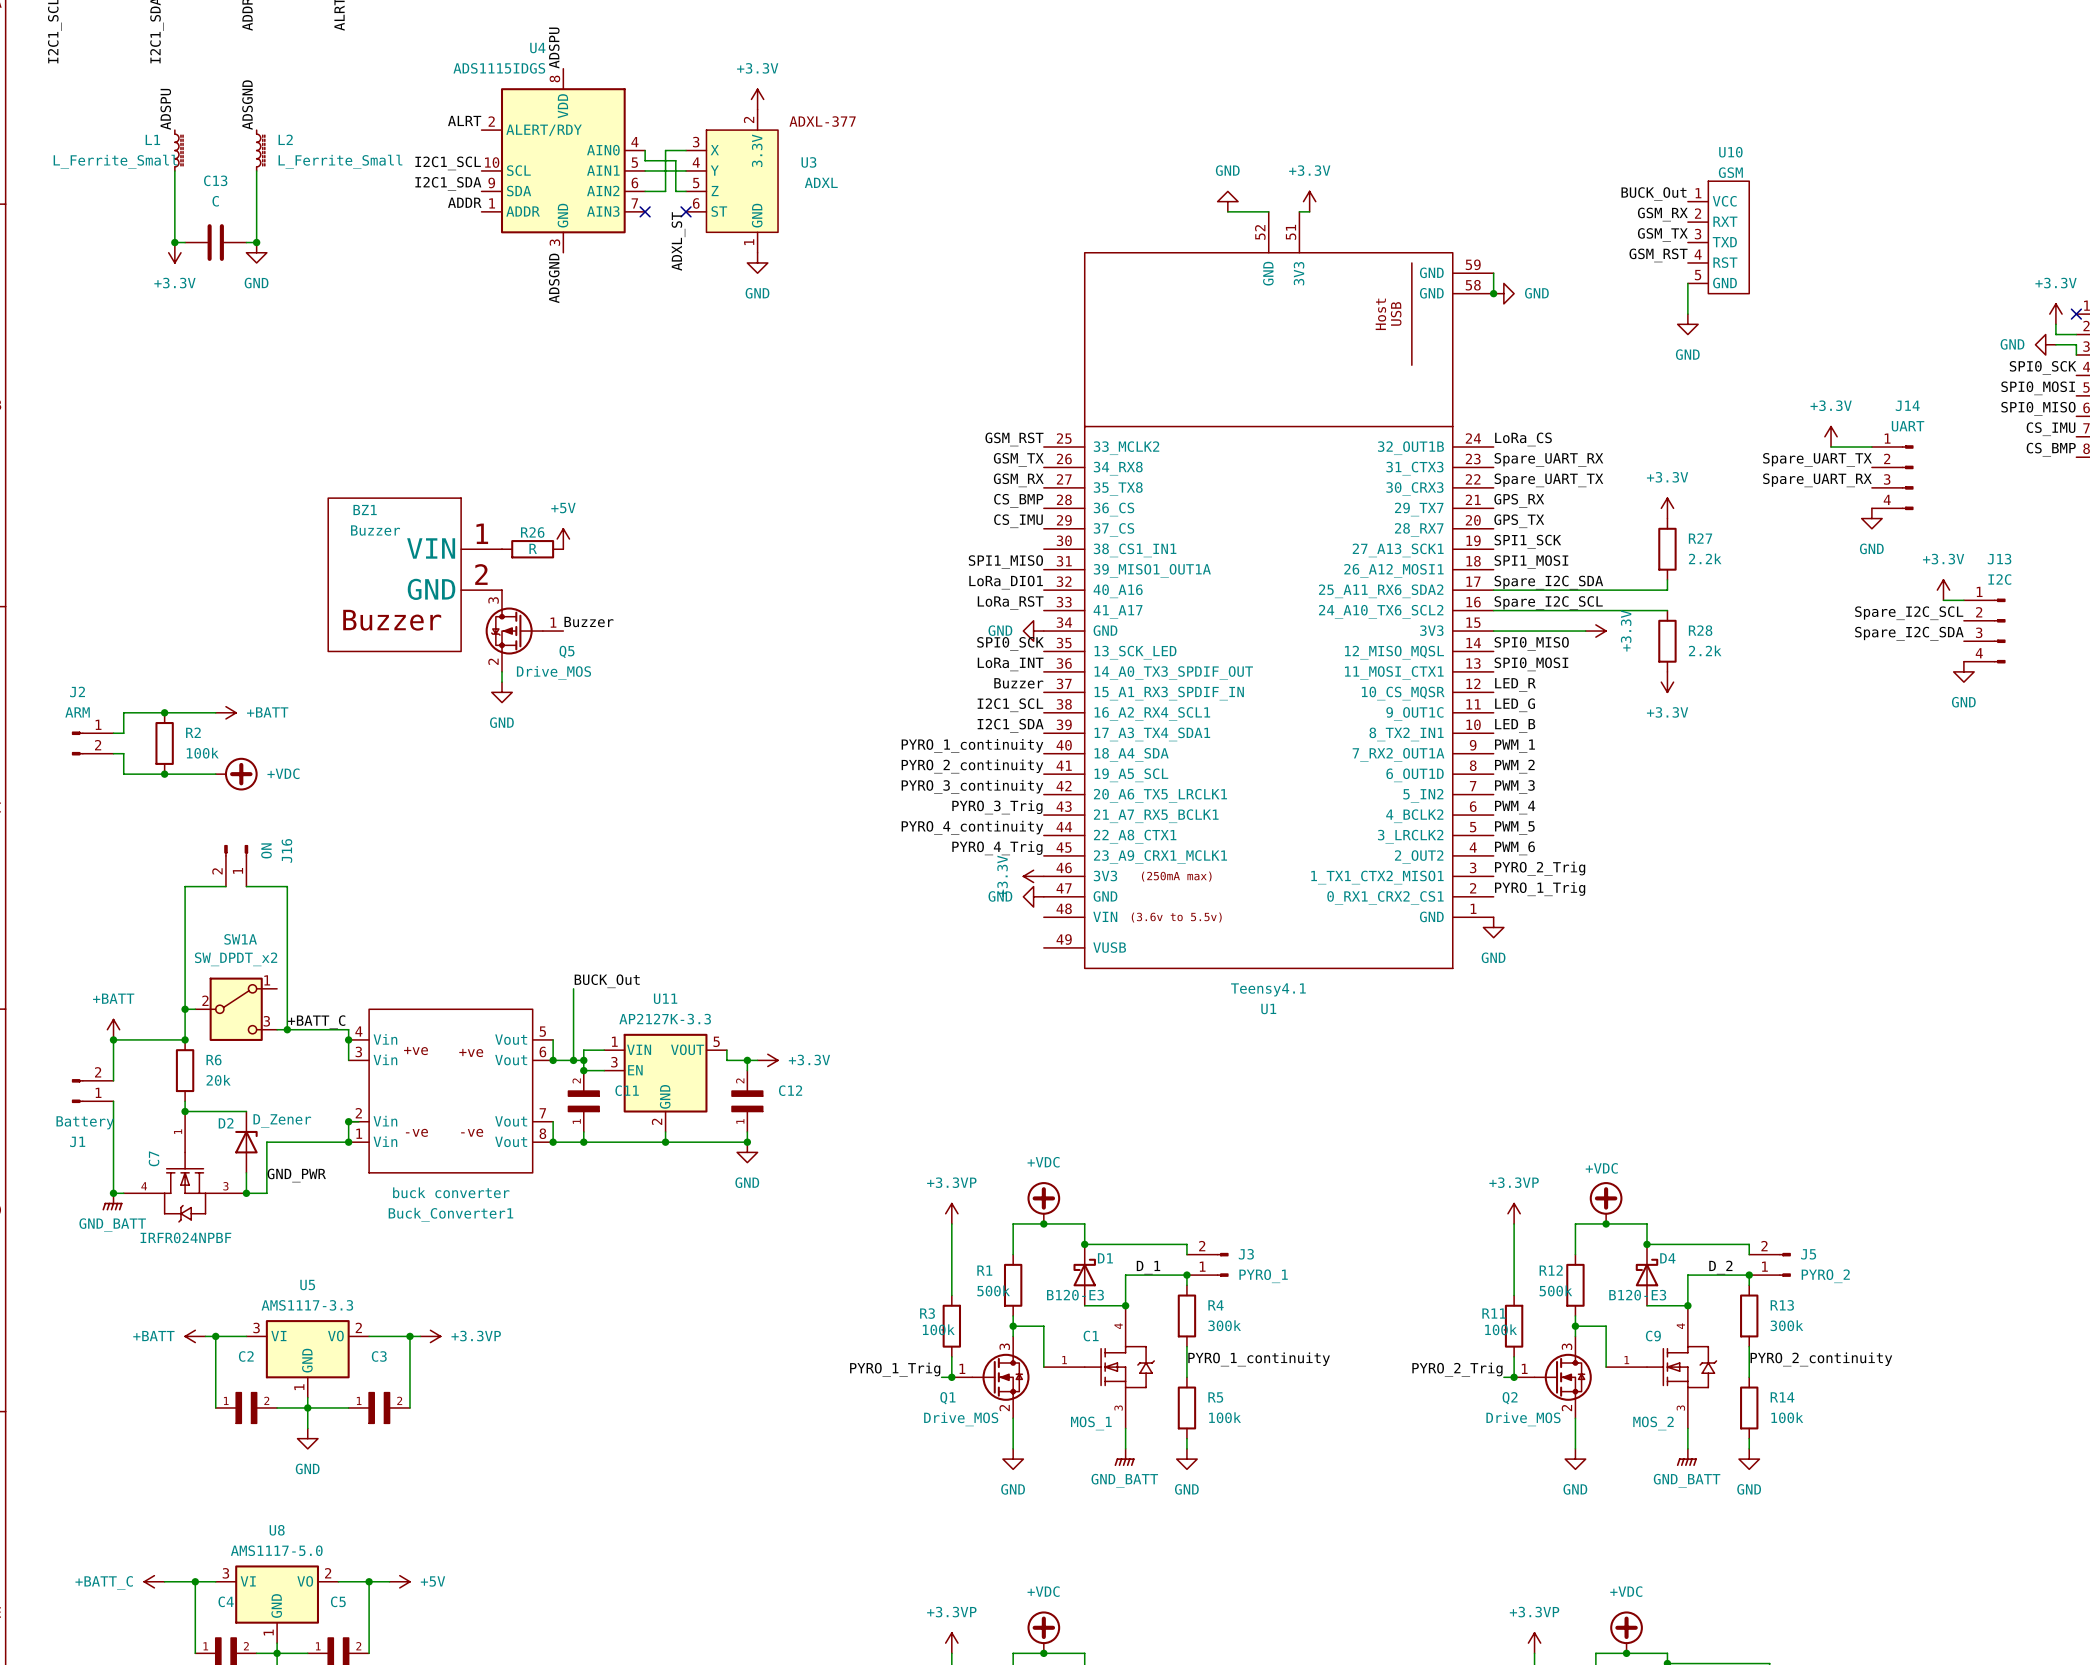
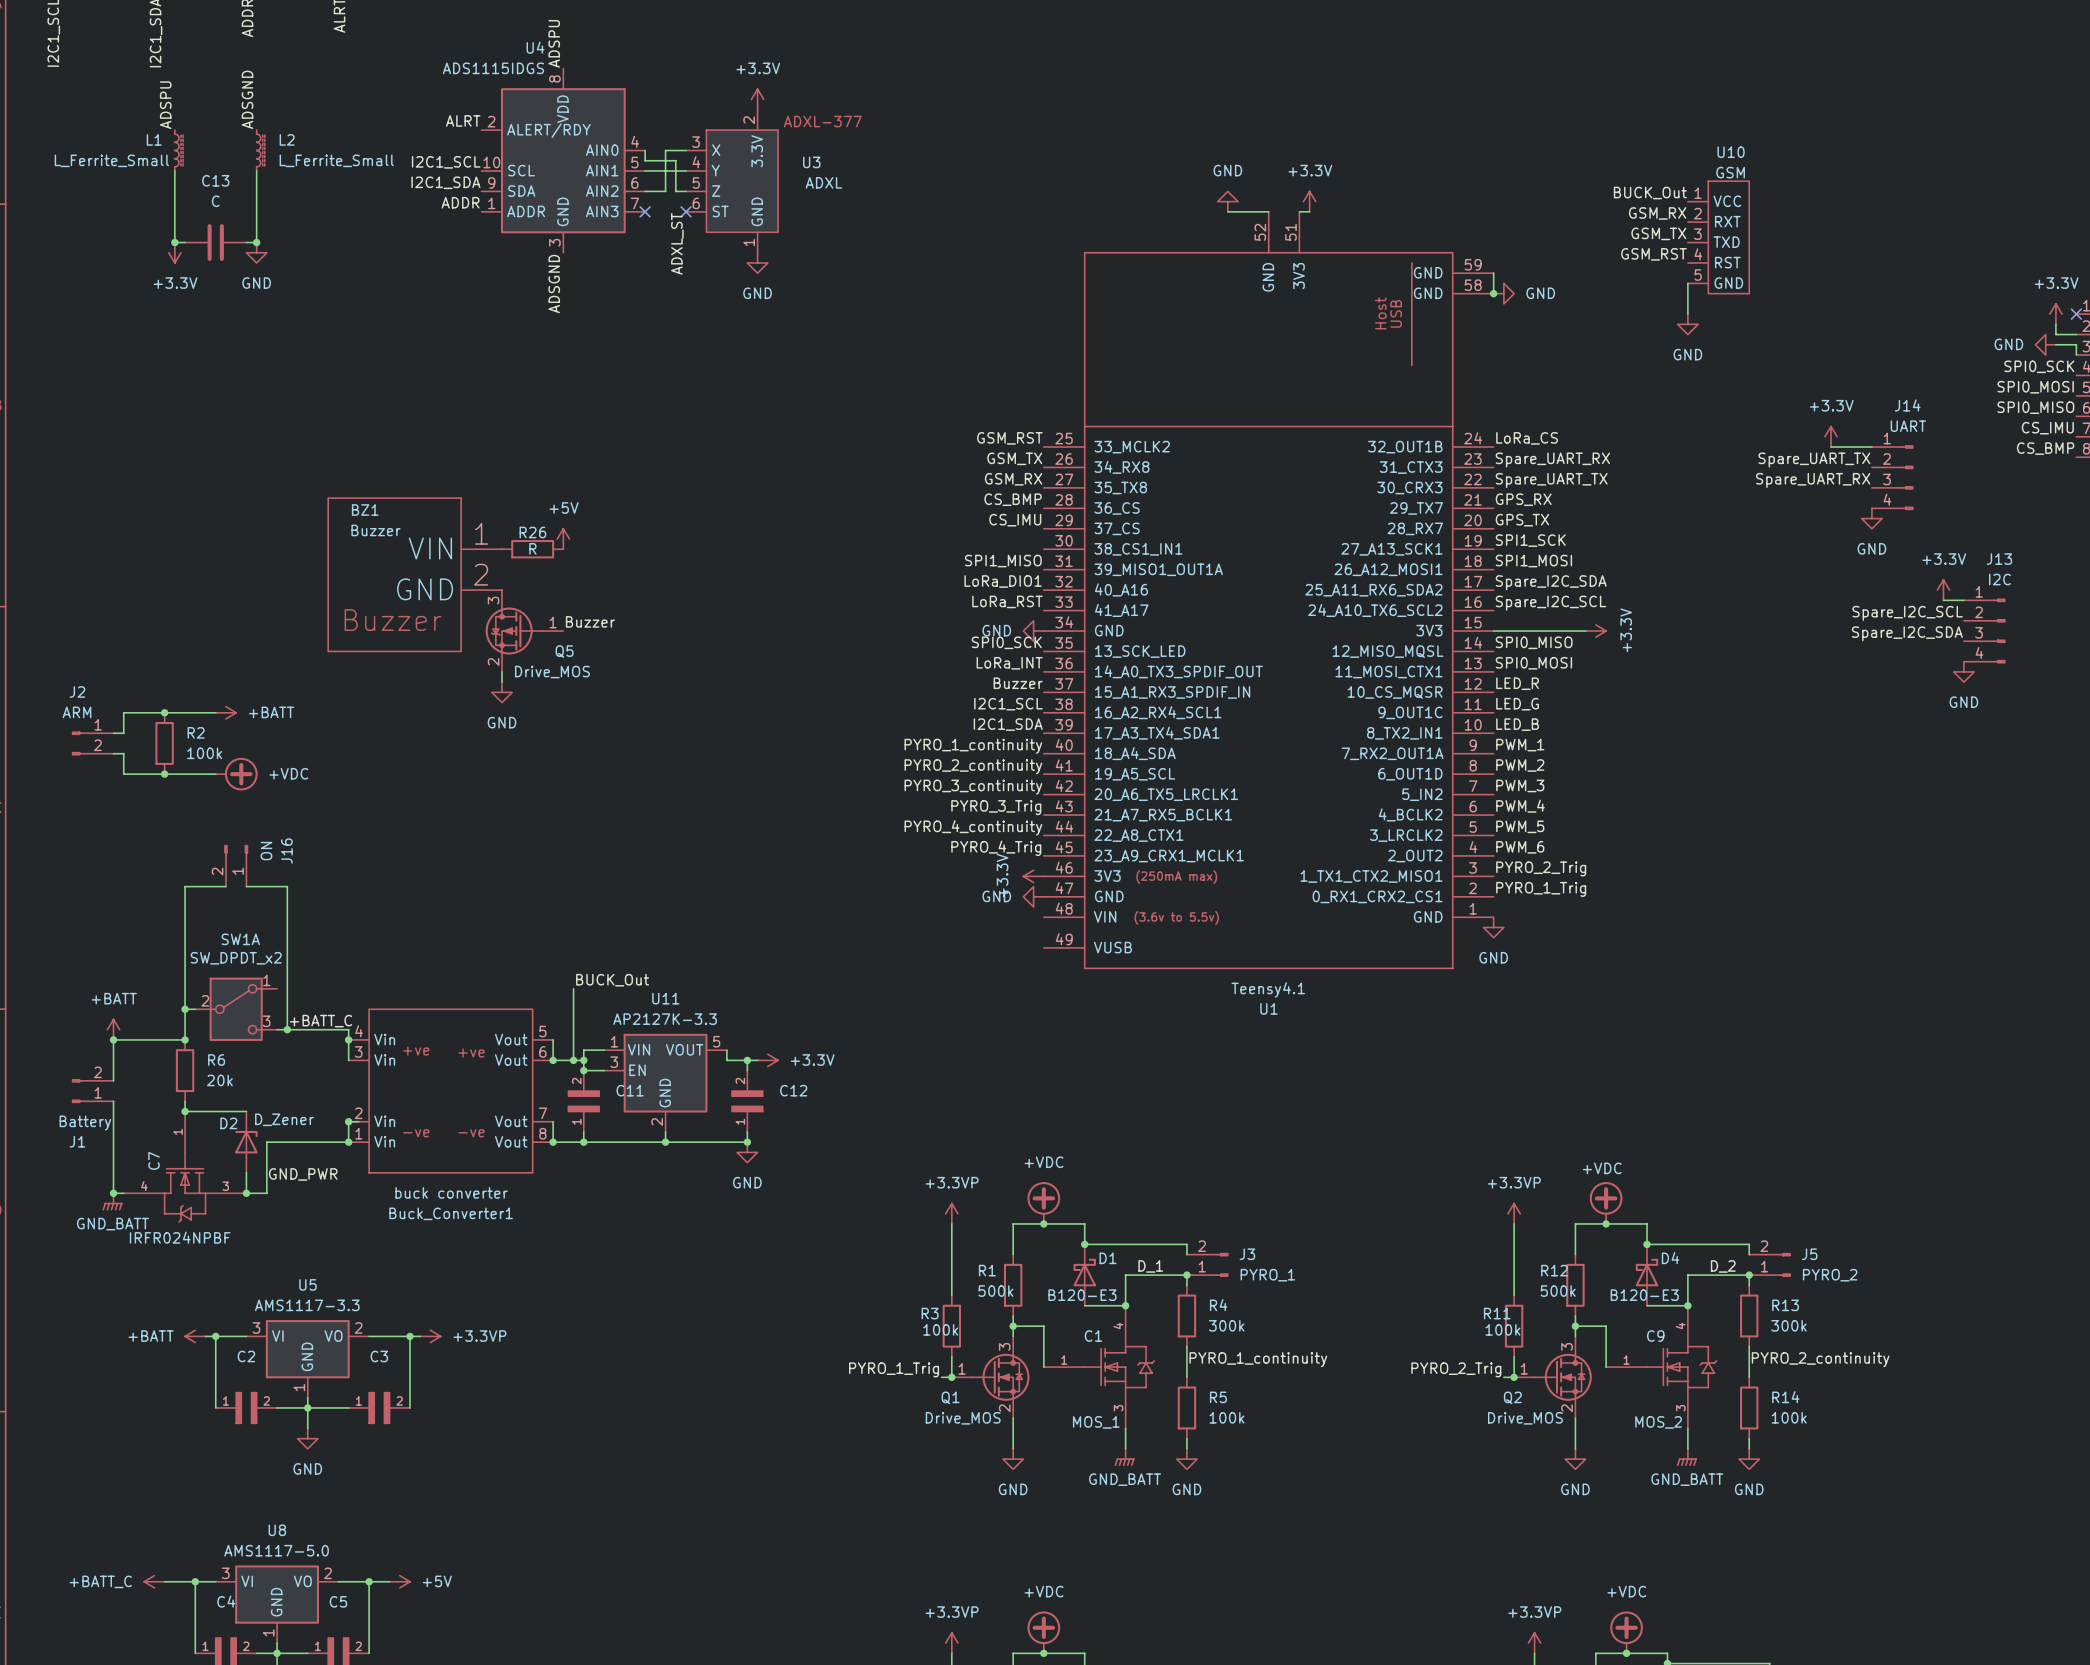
power symbol: +3.3V (1667, 508) -> none
R27: 2.2k (1667, 549) -> none
wire: (1667, 579) (1667, 590) (1493, 590) -> none
wire: (1493, 610) (1667, 610) -> none
R28: 2.2k (1667, 641) -> none
power symbol: +3.3V (1667, 682) -> none

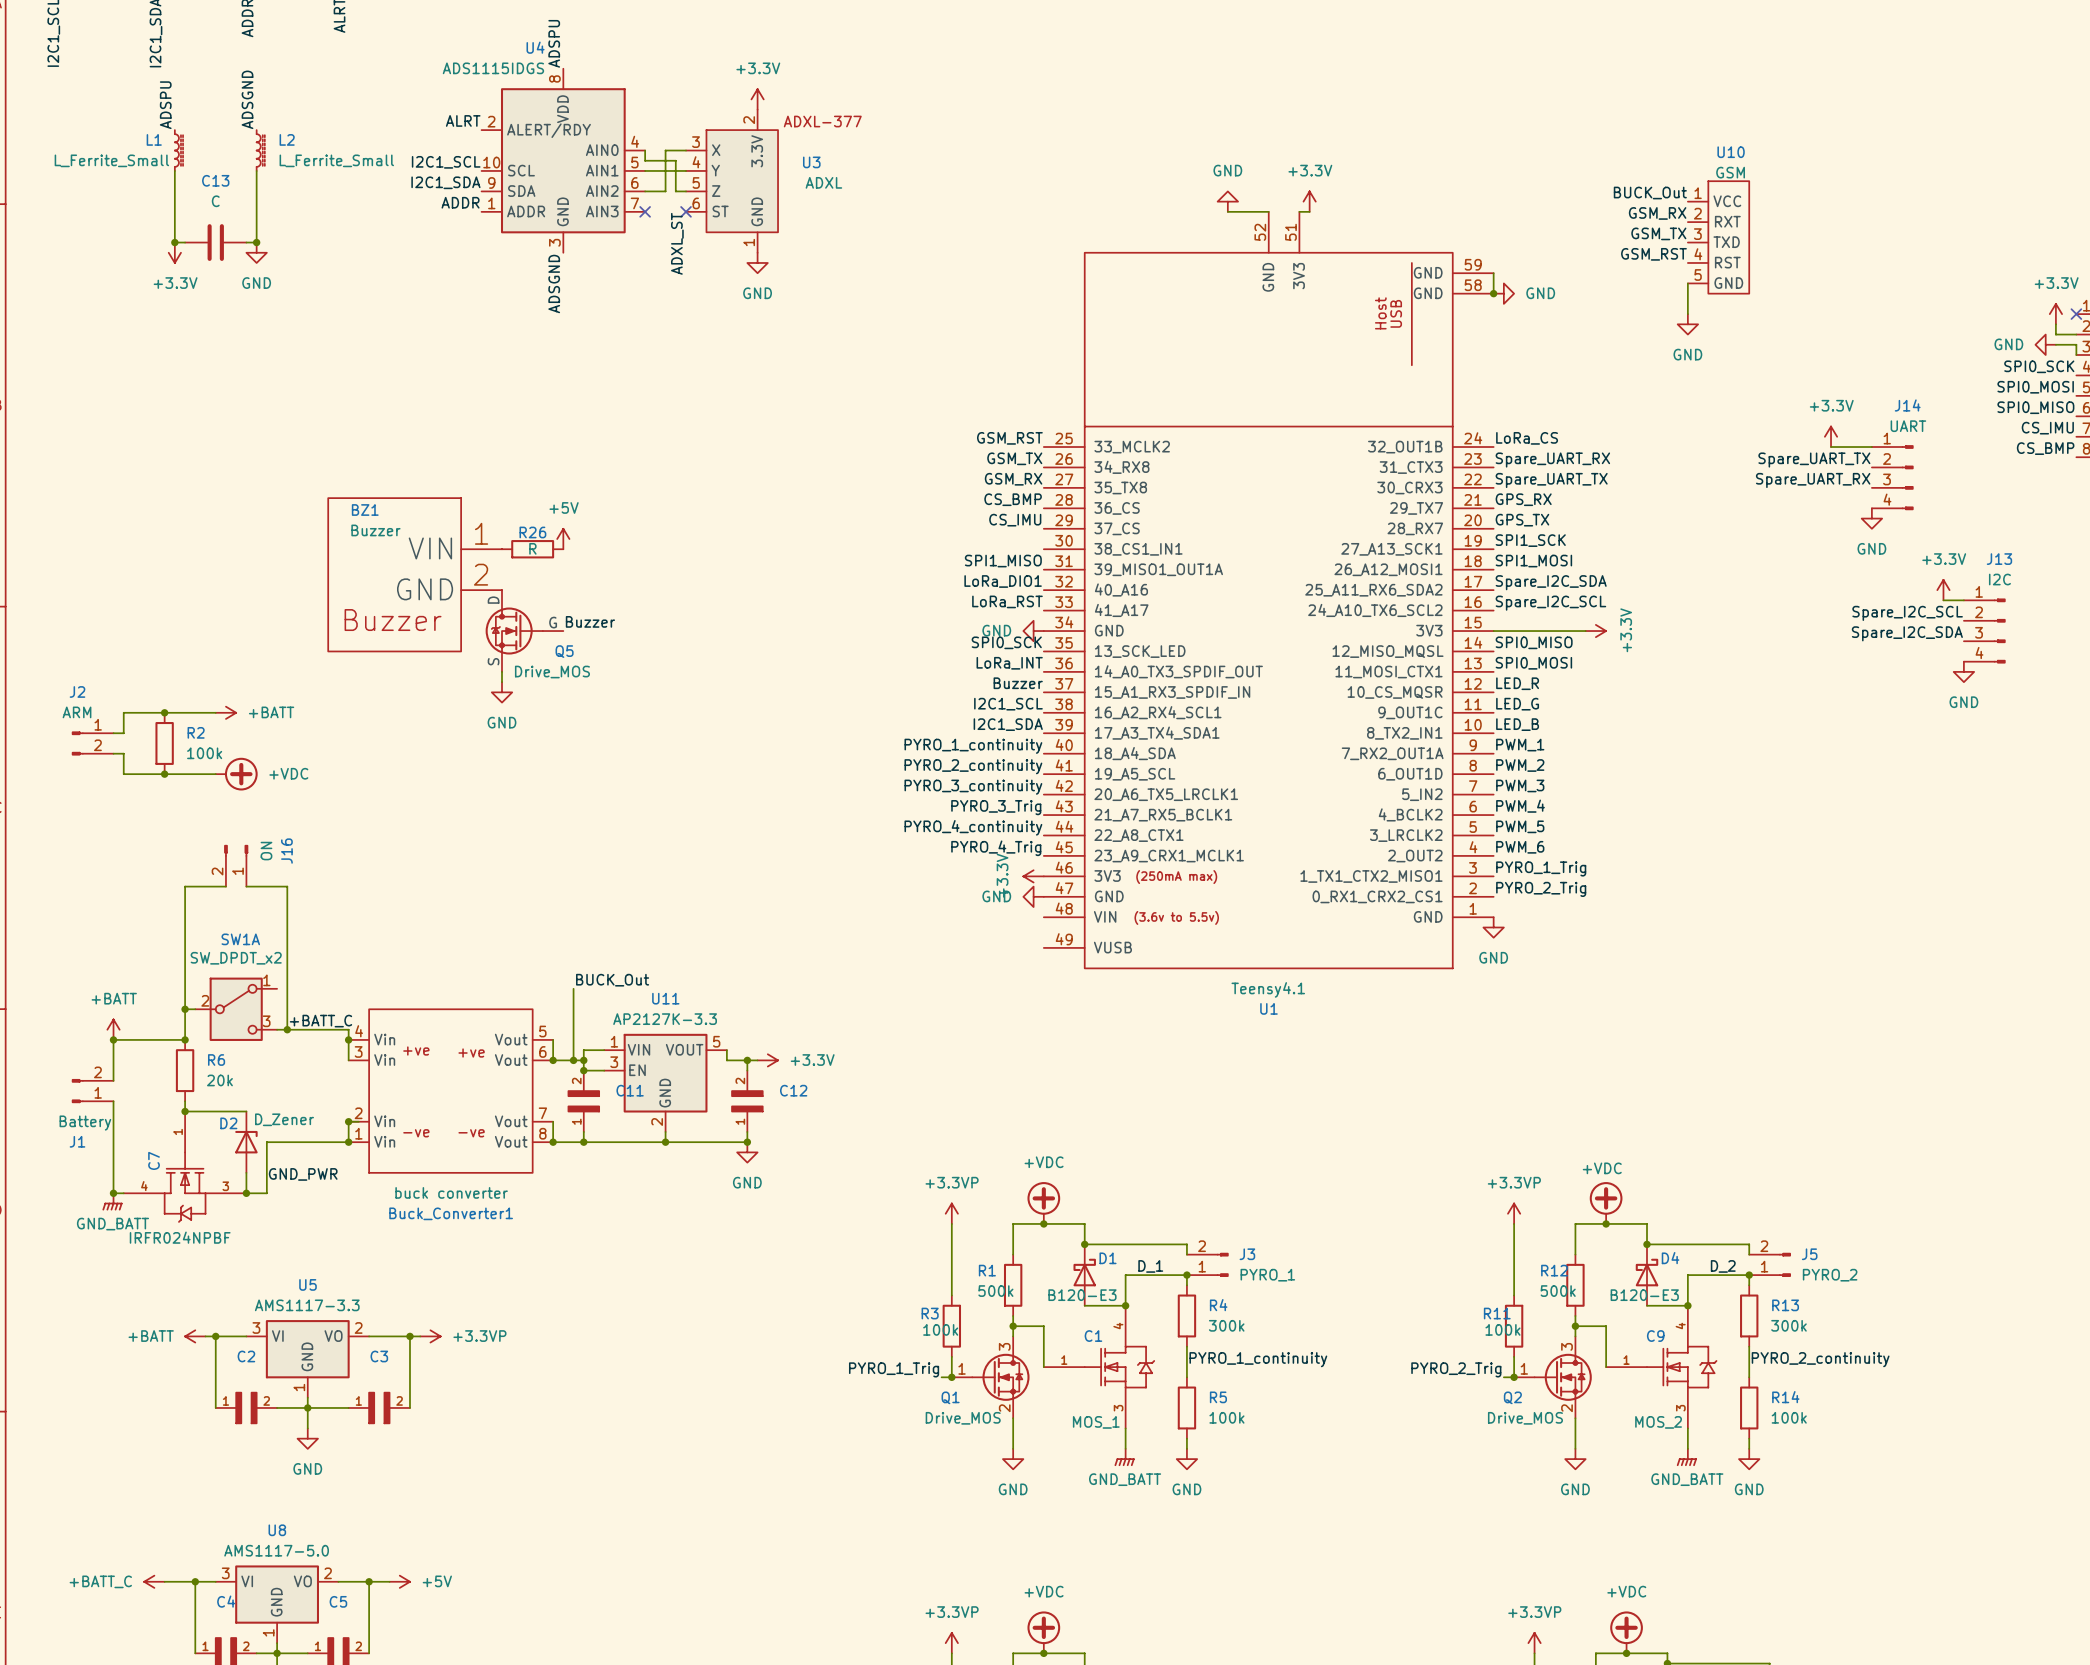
Q5 symbol: [485, 590, 564, 672] -> [485, 590, 564, 672]
label: PYRO_2_Trig (1541, 868) -> PYRO_1_Trig (1541, 868)
label: PYRO_1_Trig (1541, 889) -> PYRO_2_Trig (1541, 889)

